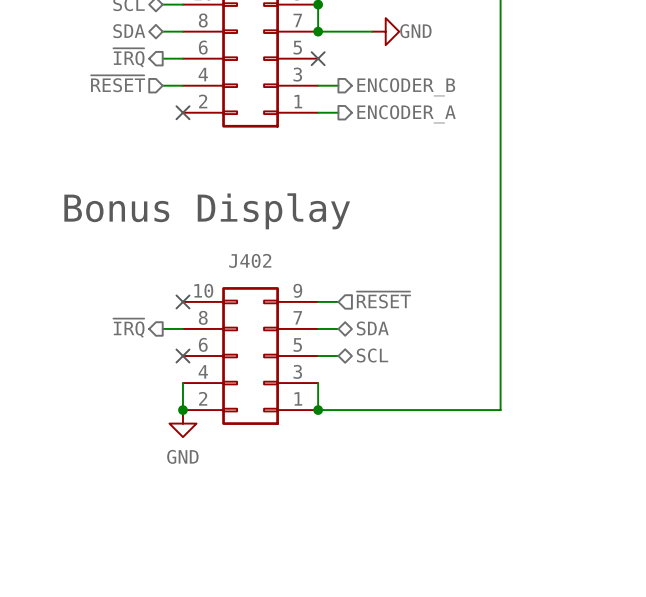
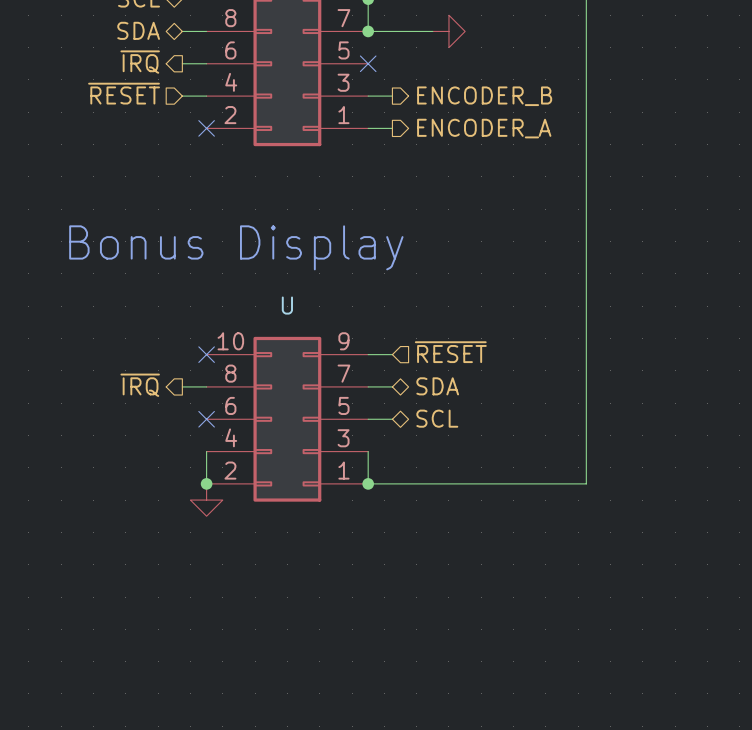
power symbol text: GND (415, 31) -> none
J402 name: J402 (250, 260) -> U (287, 305)
power symbol text: GND (182, 456) -> none

